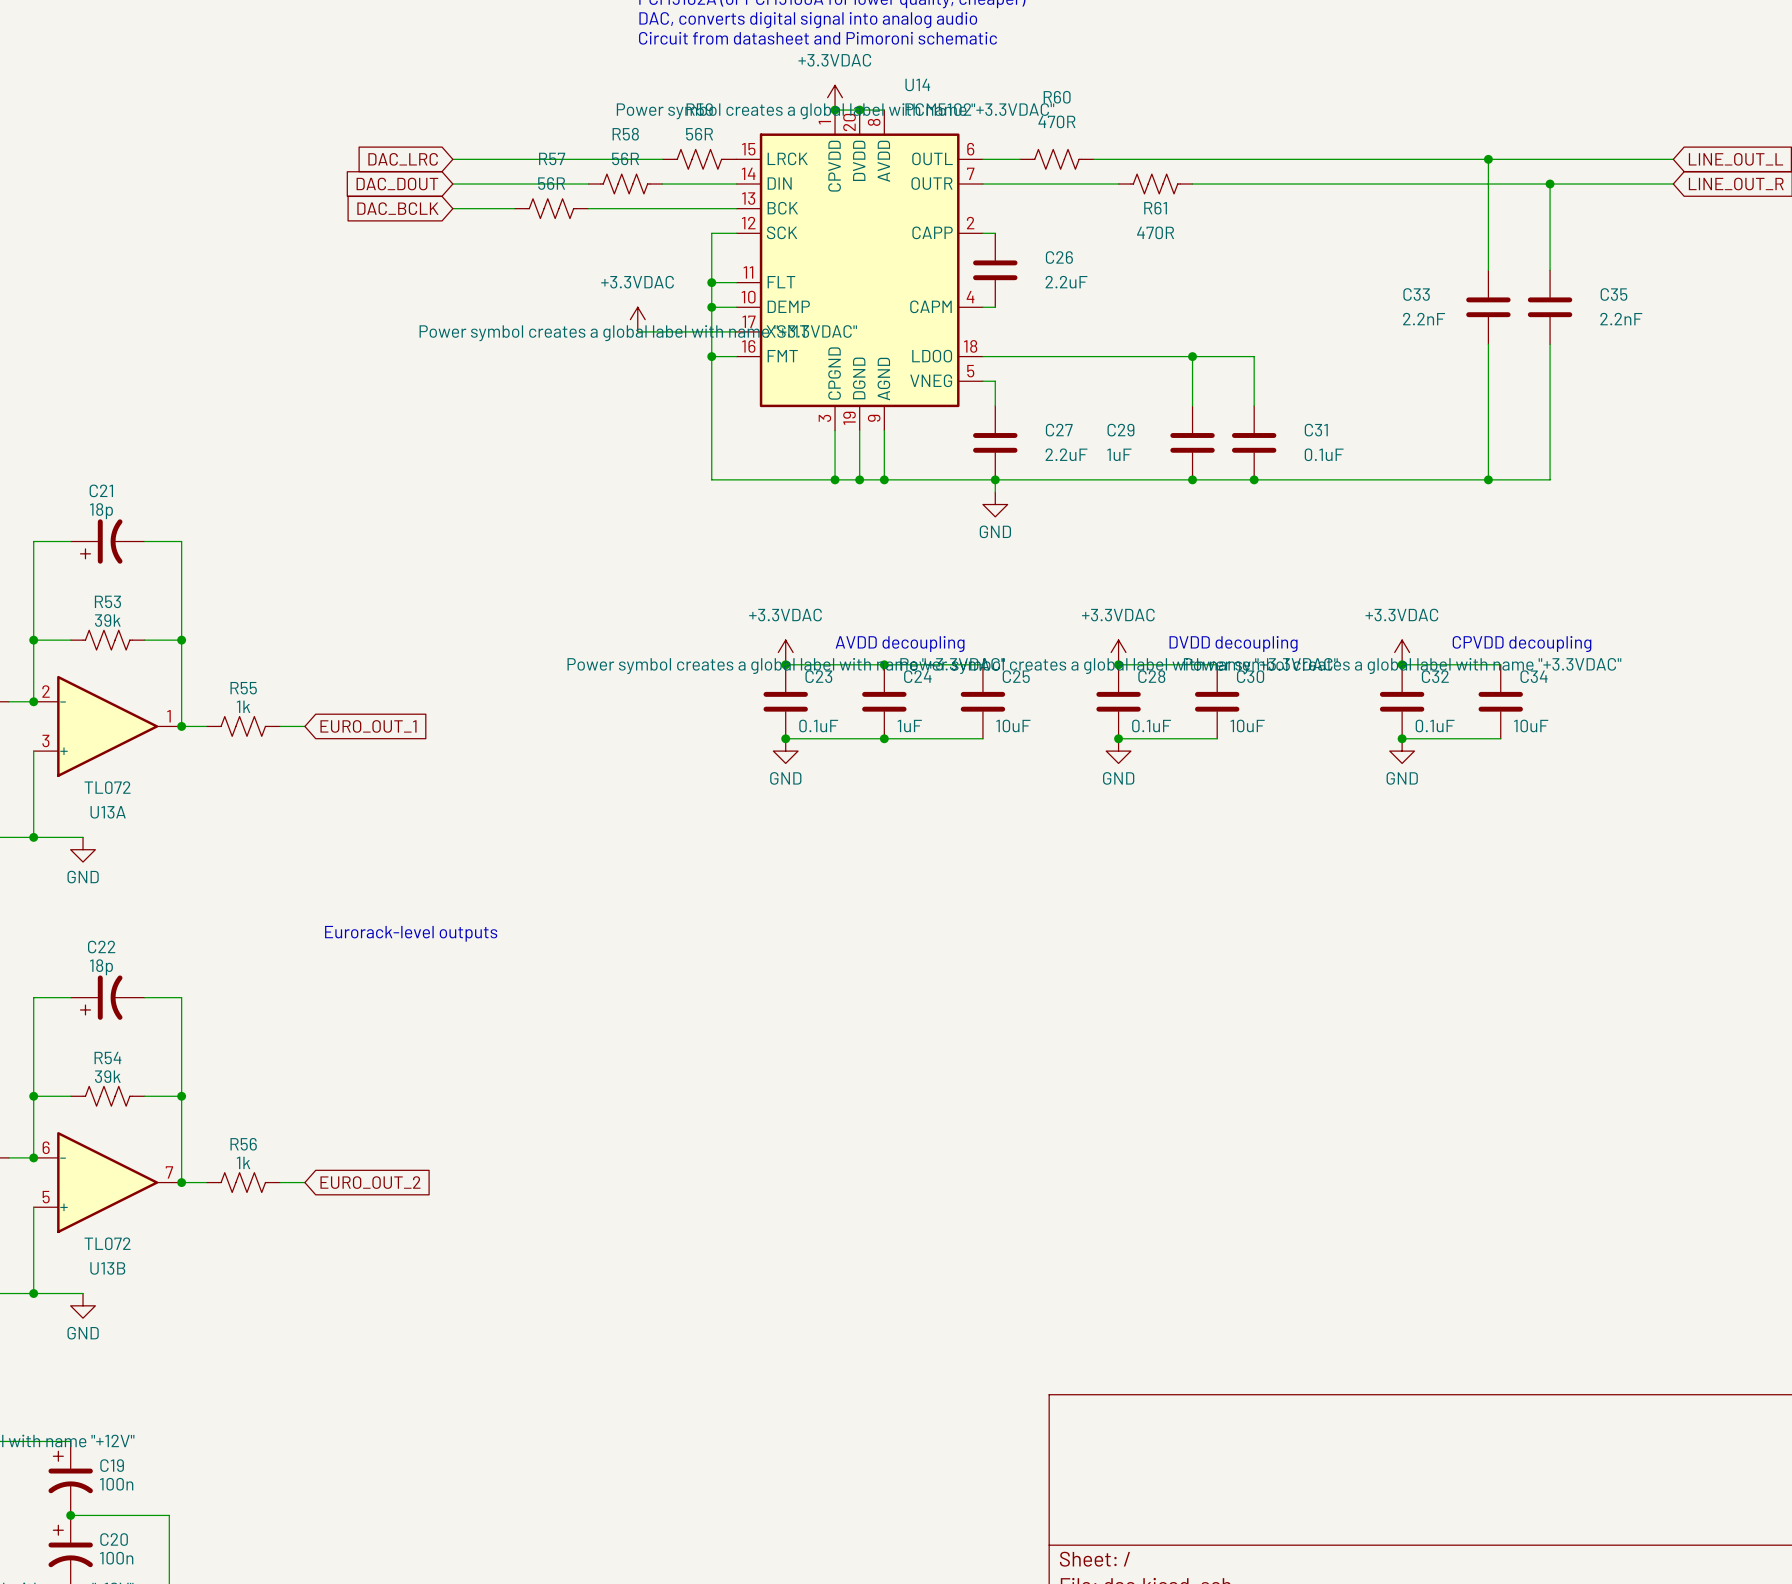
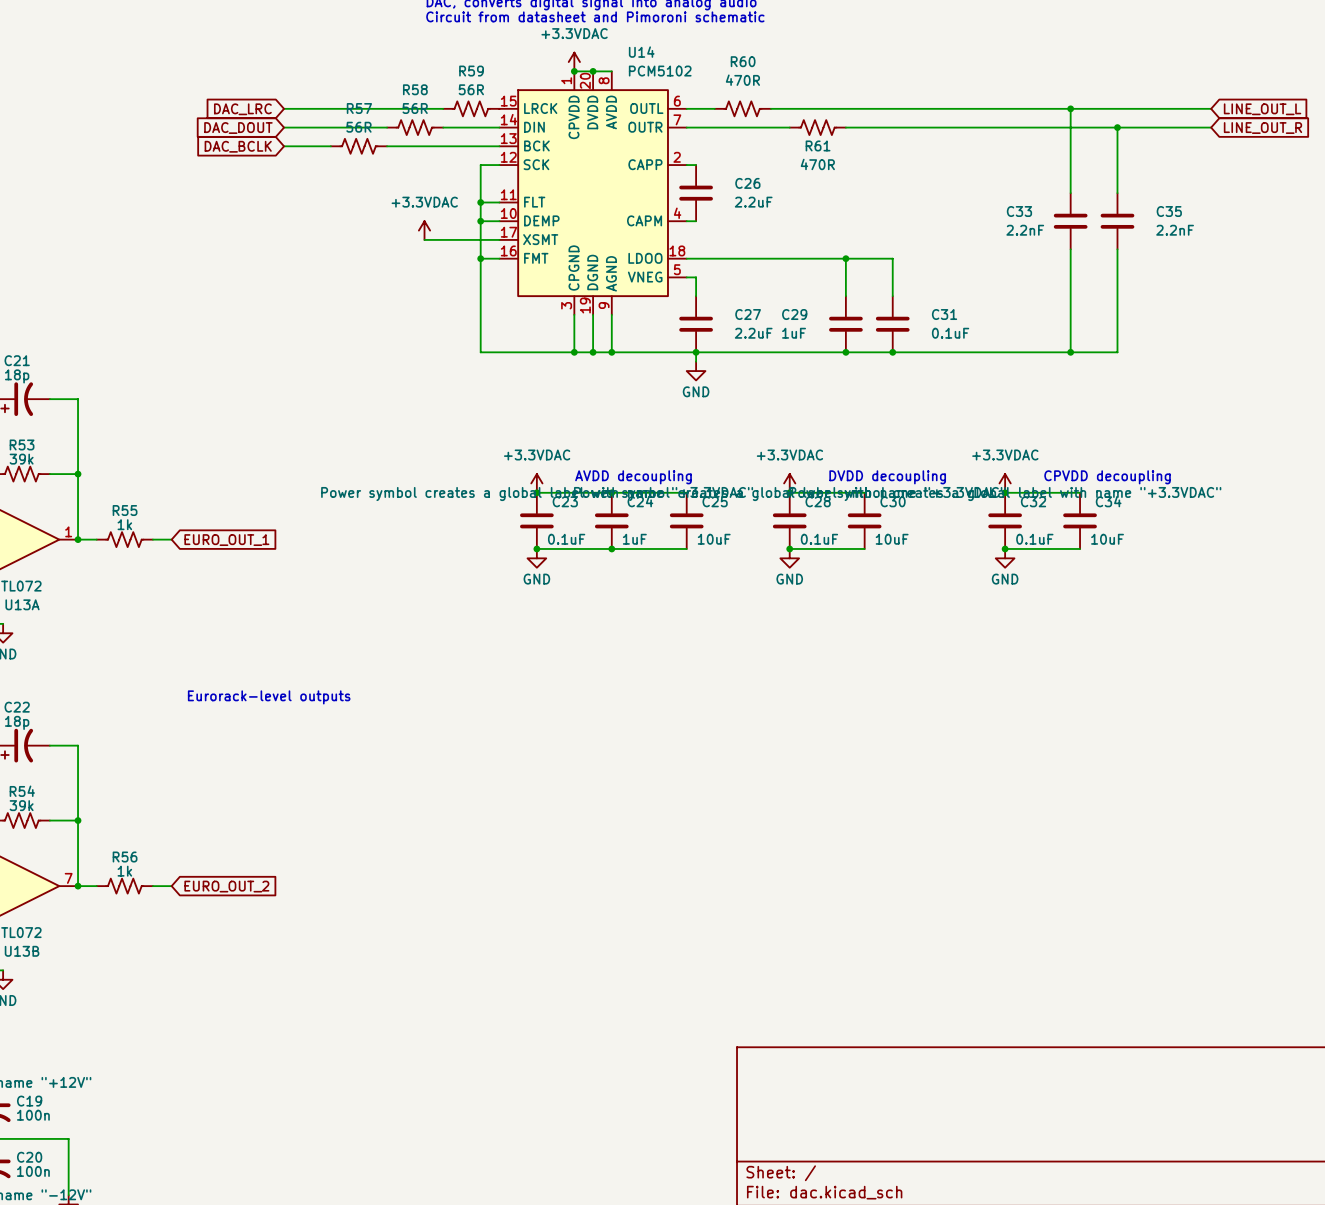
power symbol text: Power symbol creates a global label with name "+3.3VDAC" (835, 111) -> none
power symbol text: Power symbol creates a global label with name "+3.3VDAC" (638, 333) -> none

